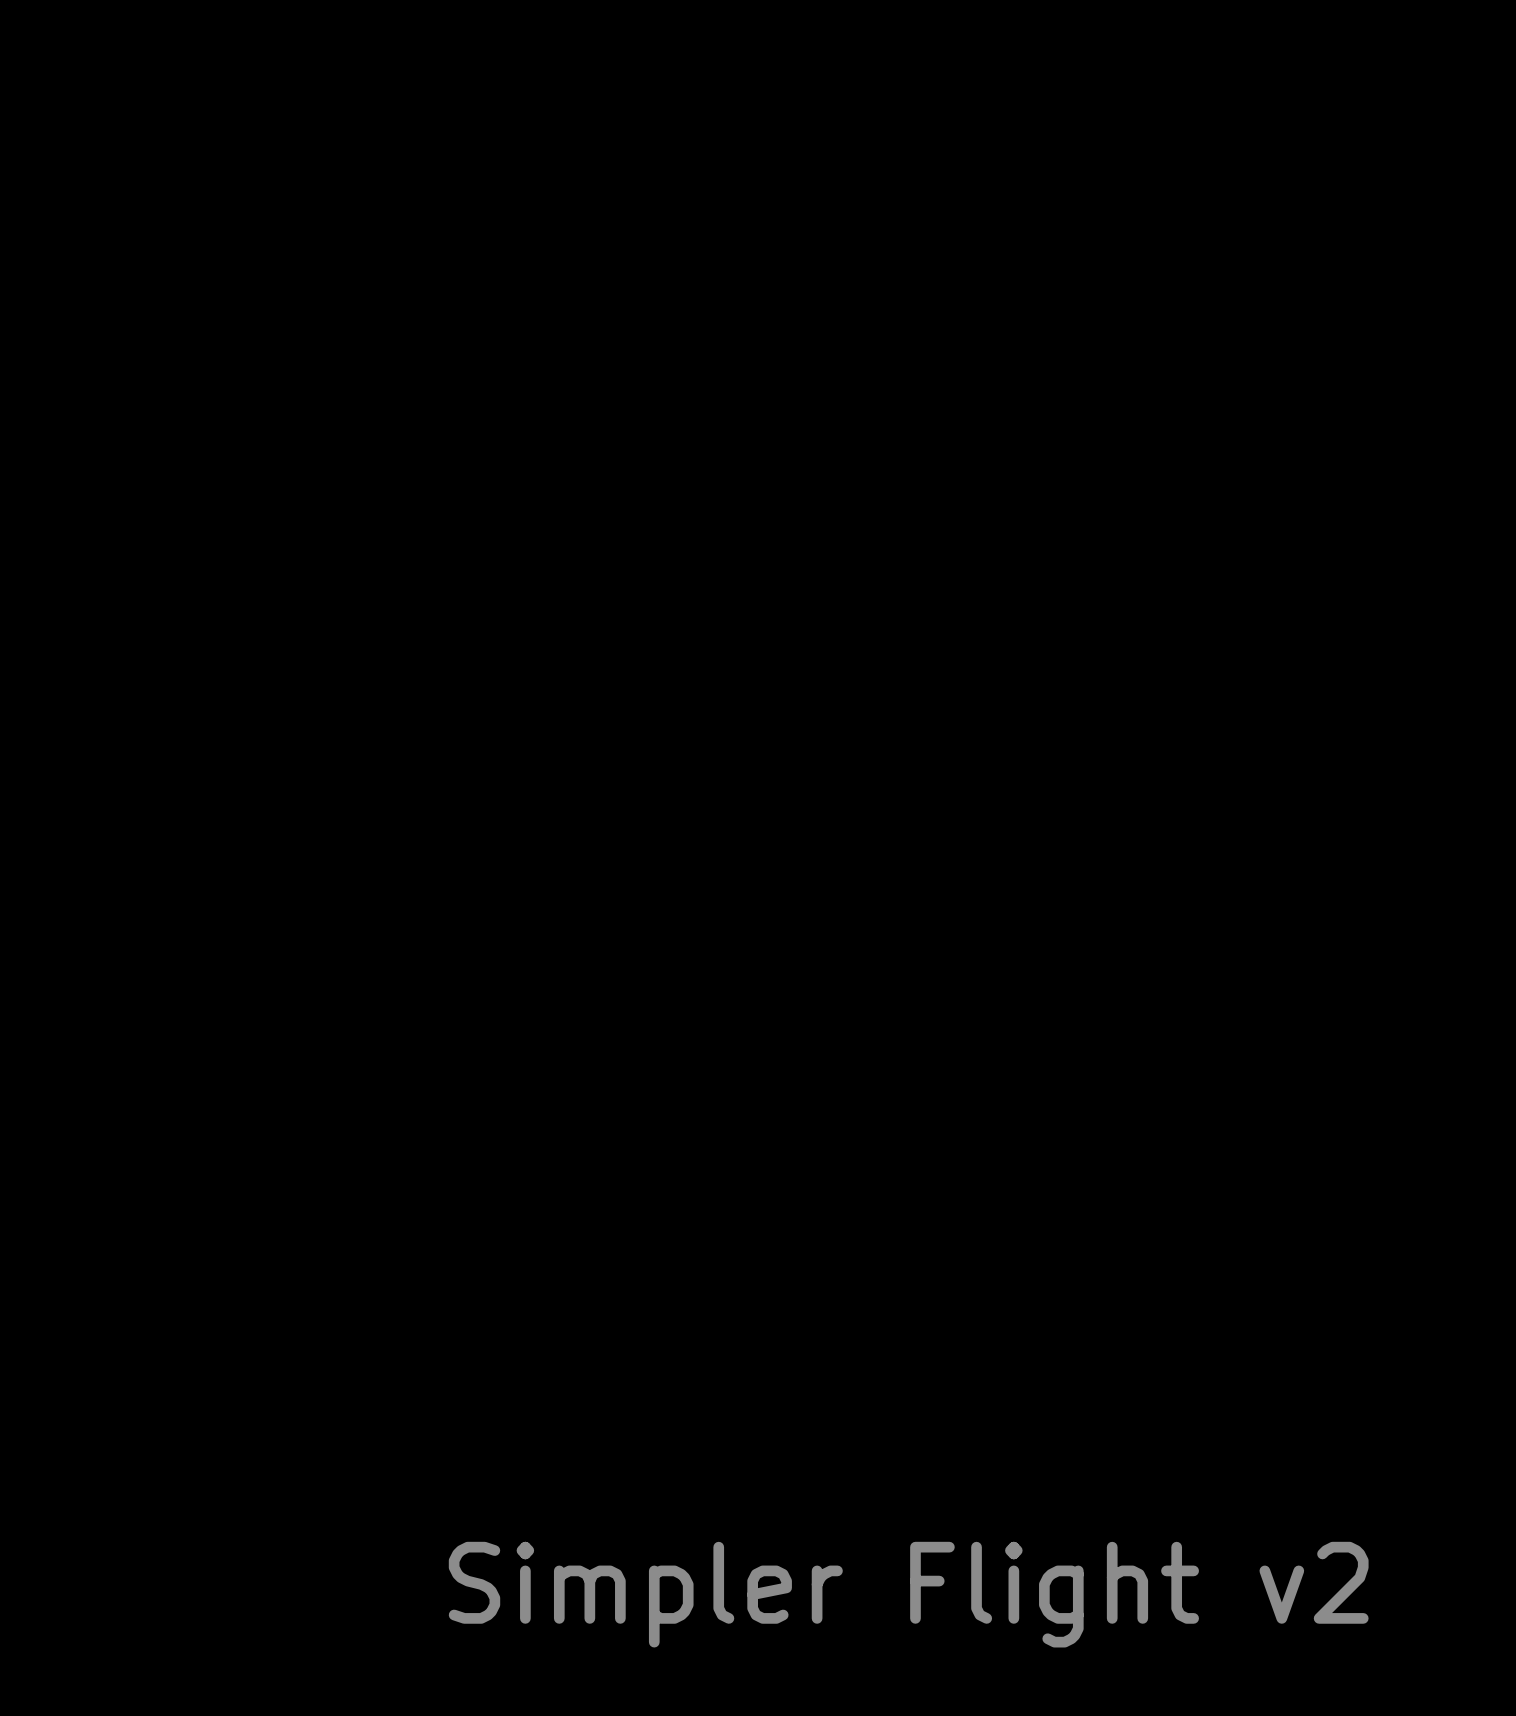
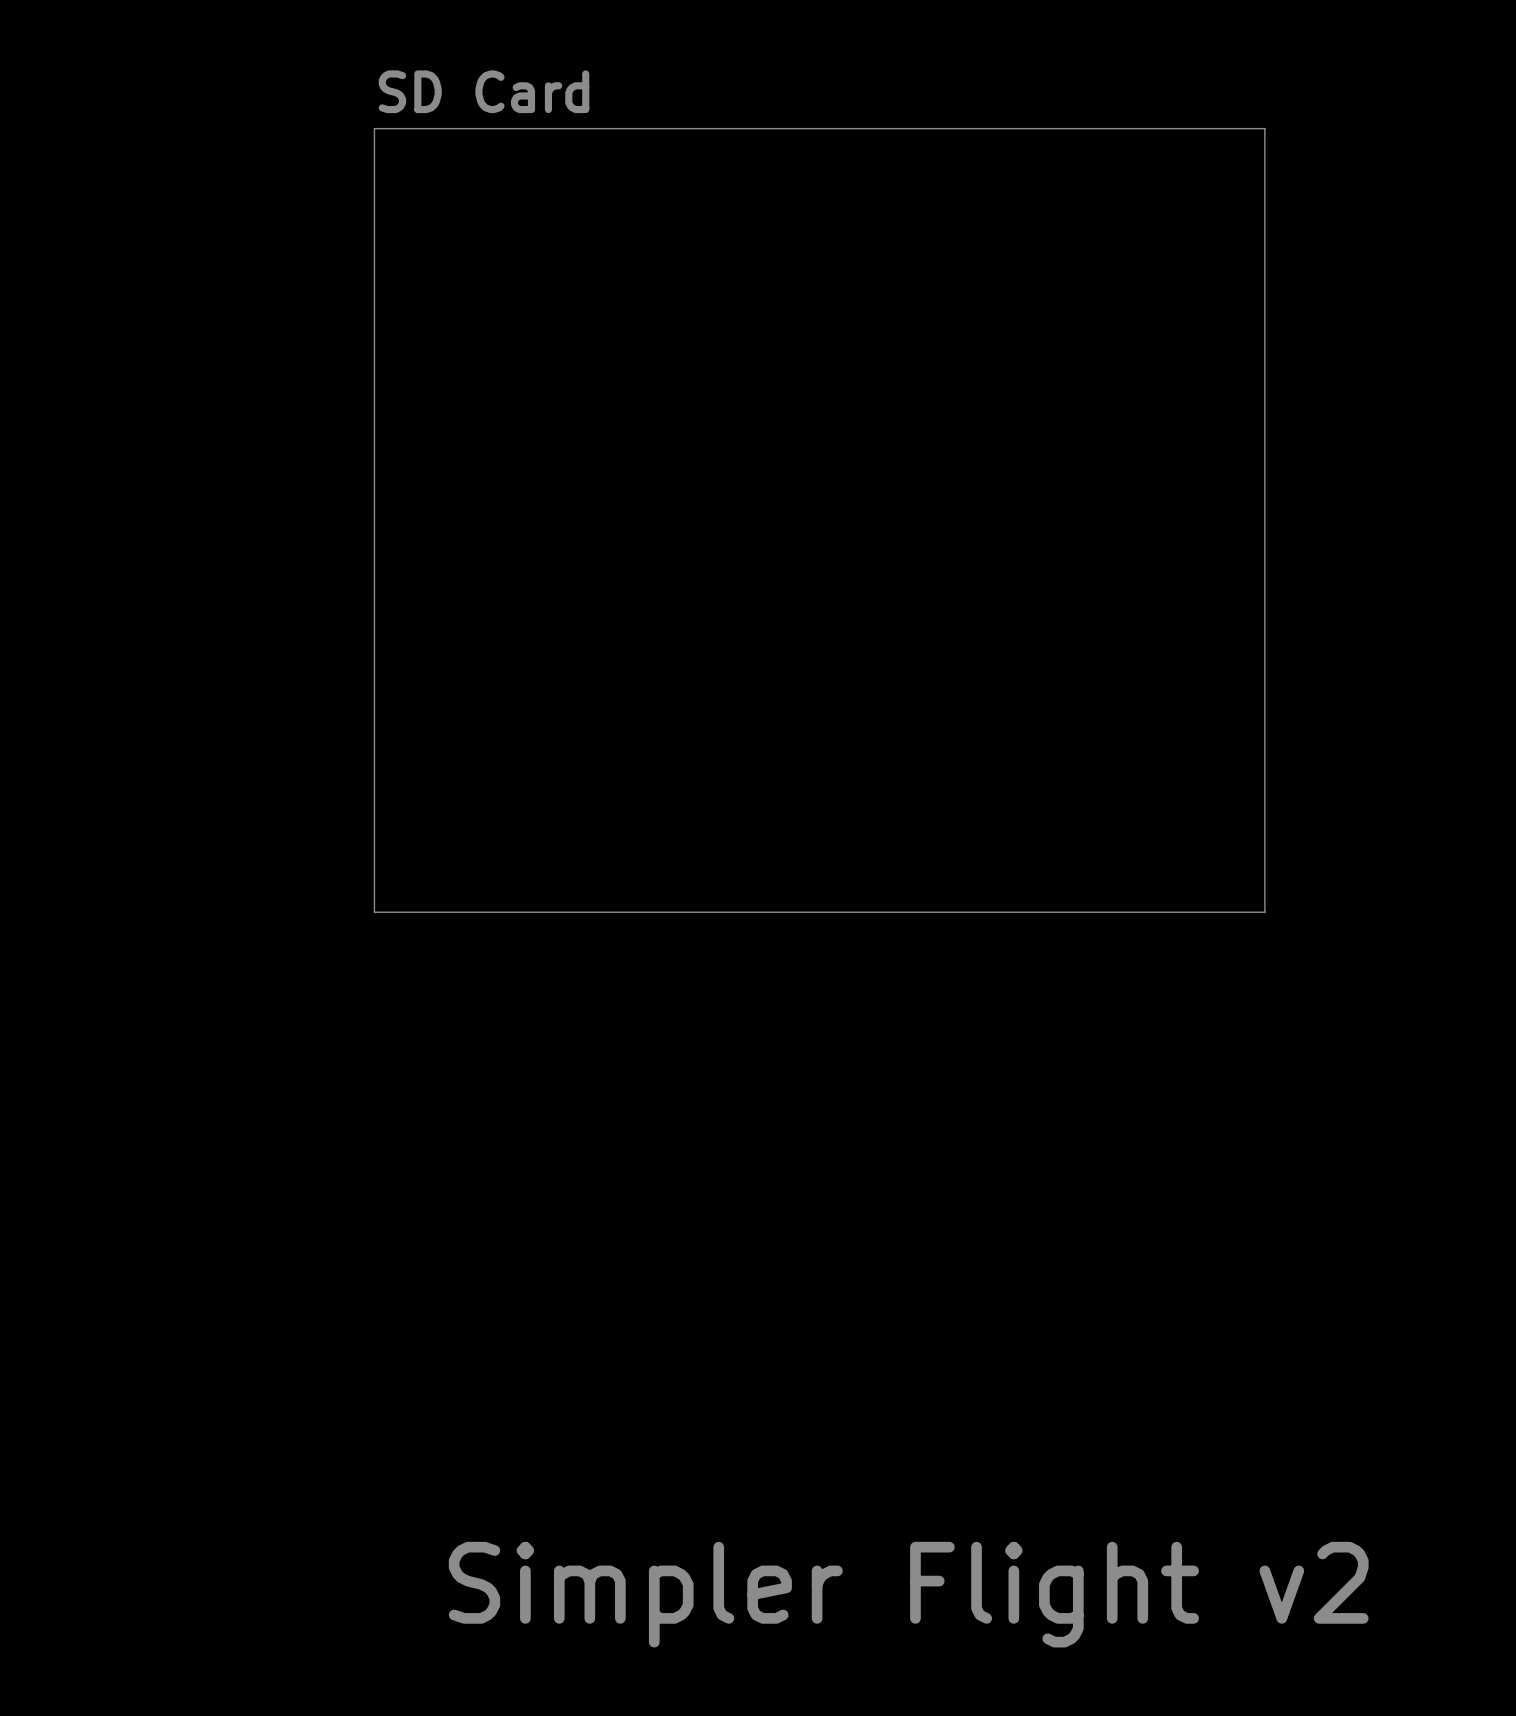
text: none -> SD Card (484, 91)
line: none -> (374, 128) (1264, 128) (1264, 912) (374, 912) (374, 128)

